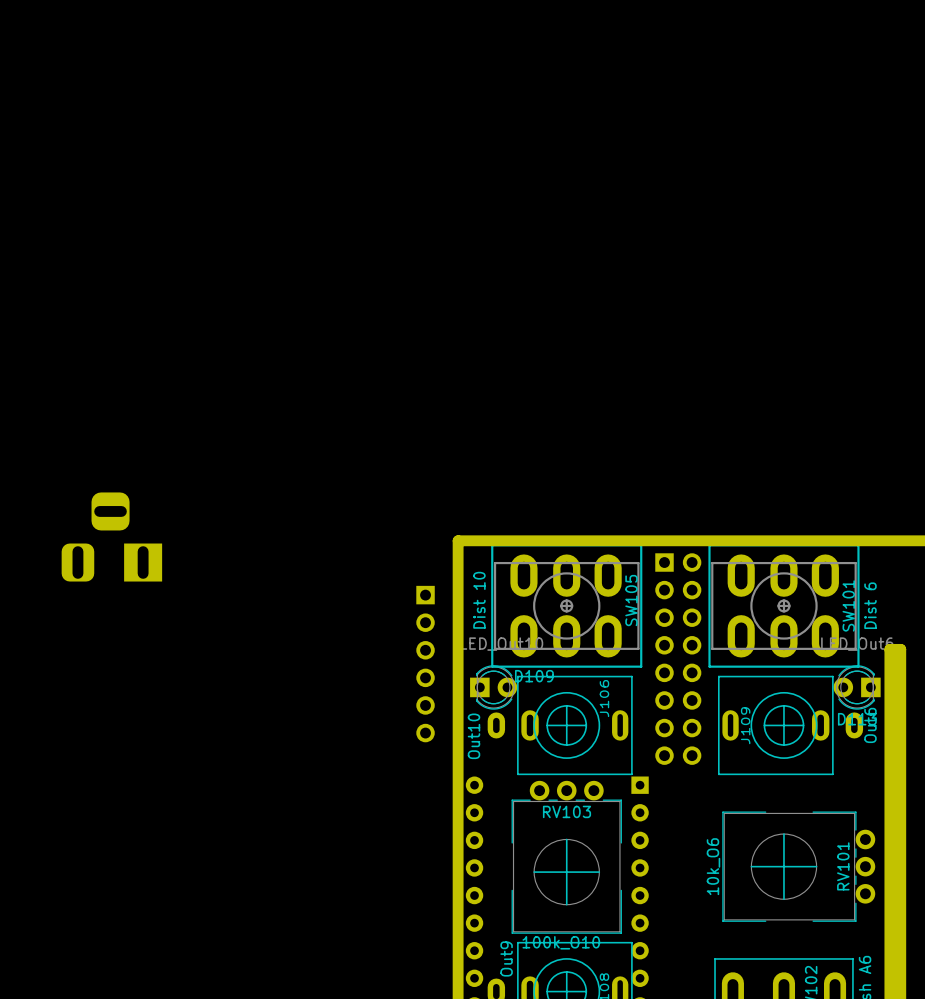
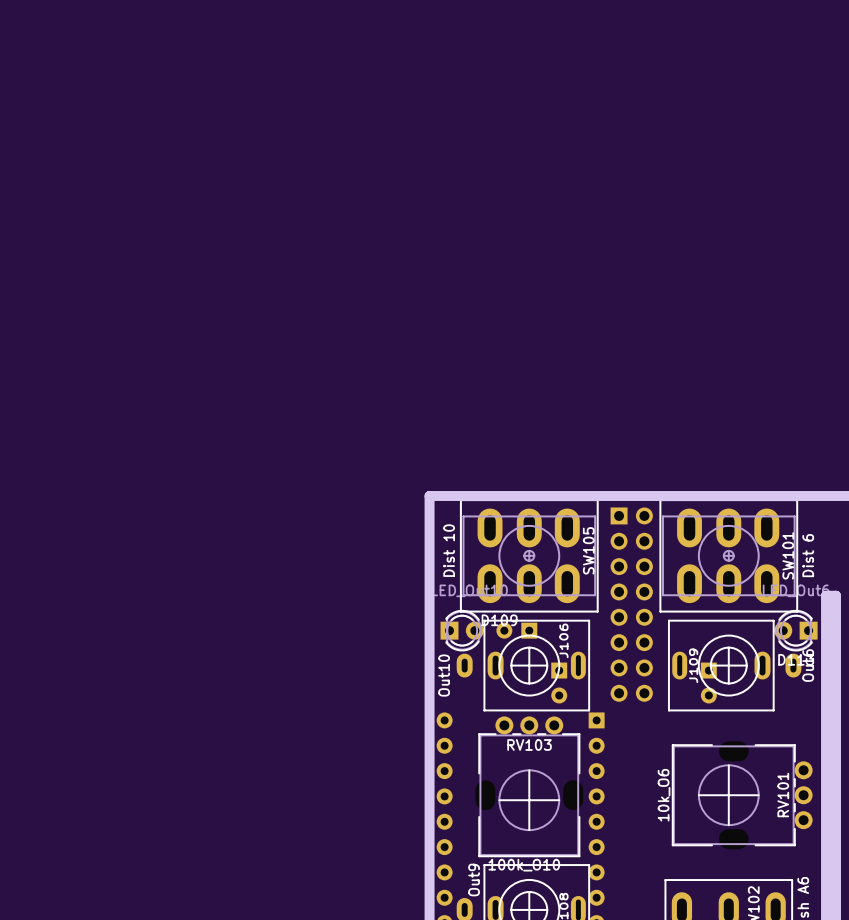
part: (111, 536) -> none
part: (425, 664) -> none
part: none -> (516, 630)
part: none -> (559, 683)
part: none -> (708, 683)

